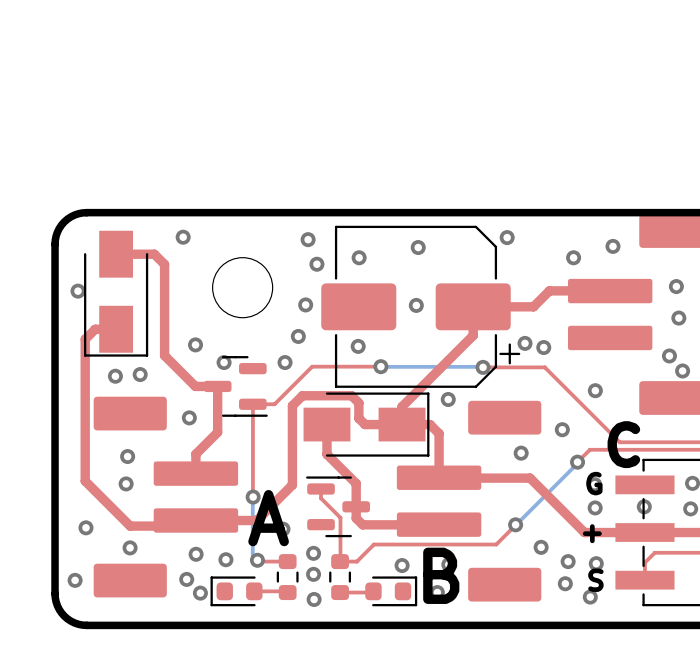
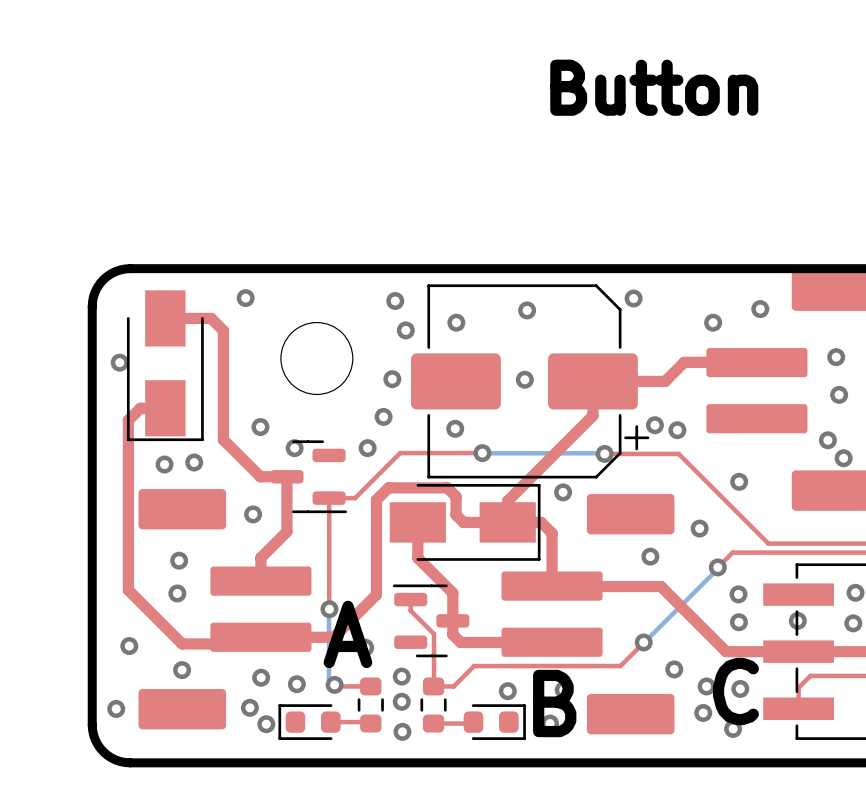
text: none -> Button (654, 87)
text: C (623, 444) -> none
text: G (594, 483) -> none
text: + (592, 533) -> none
text: S (595, 580) -> C (735, 691)

